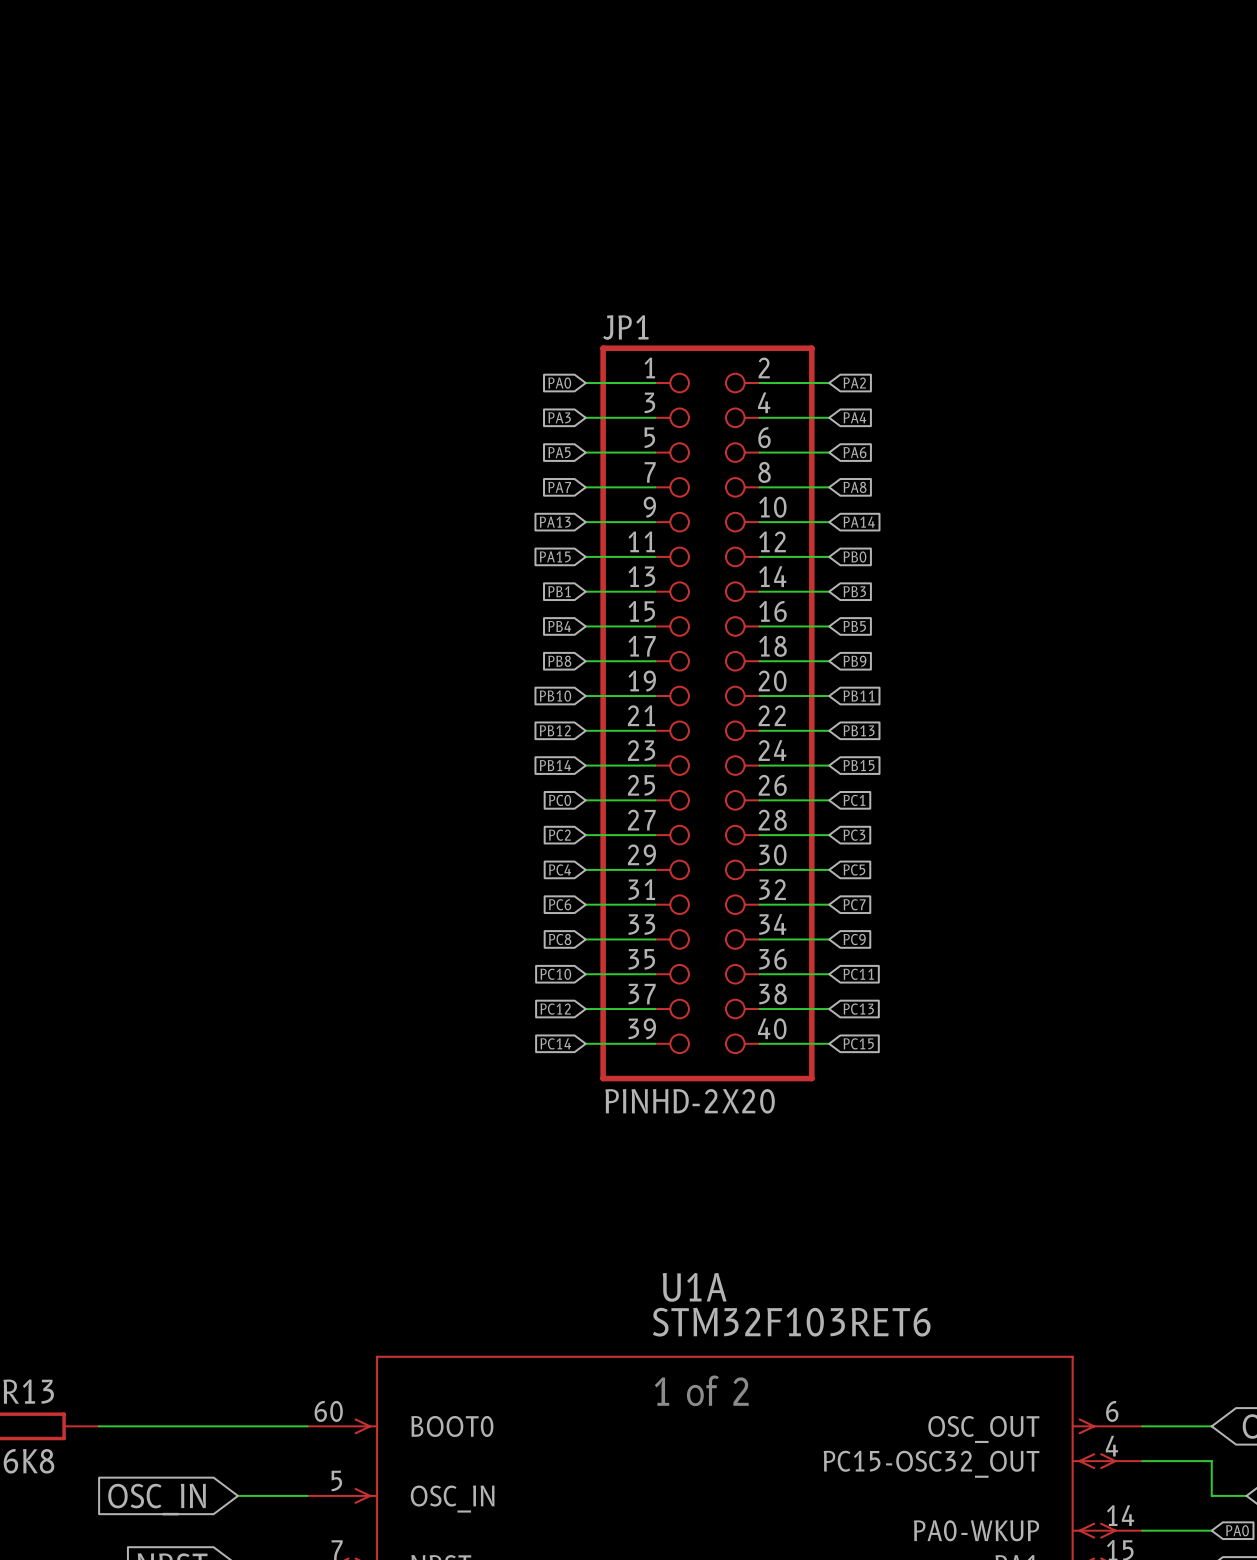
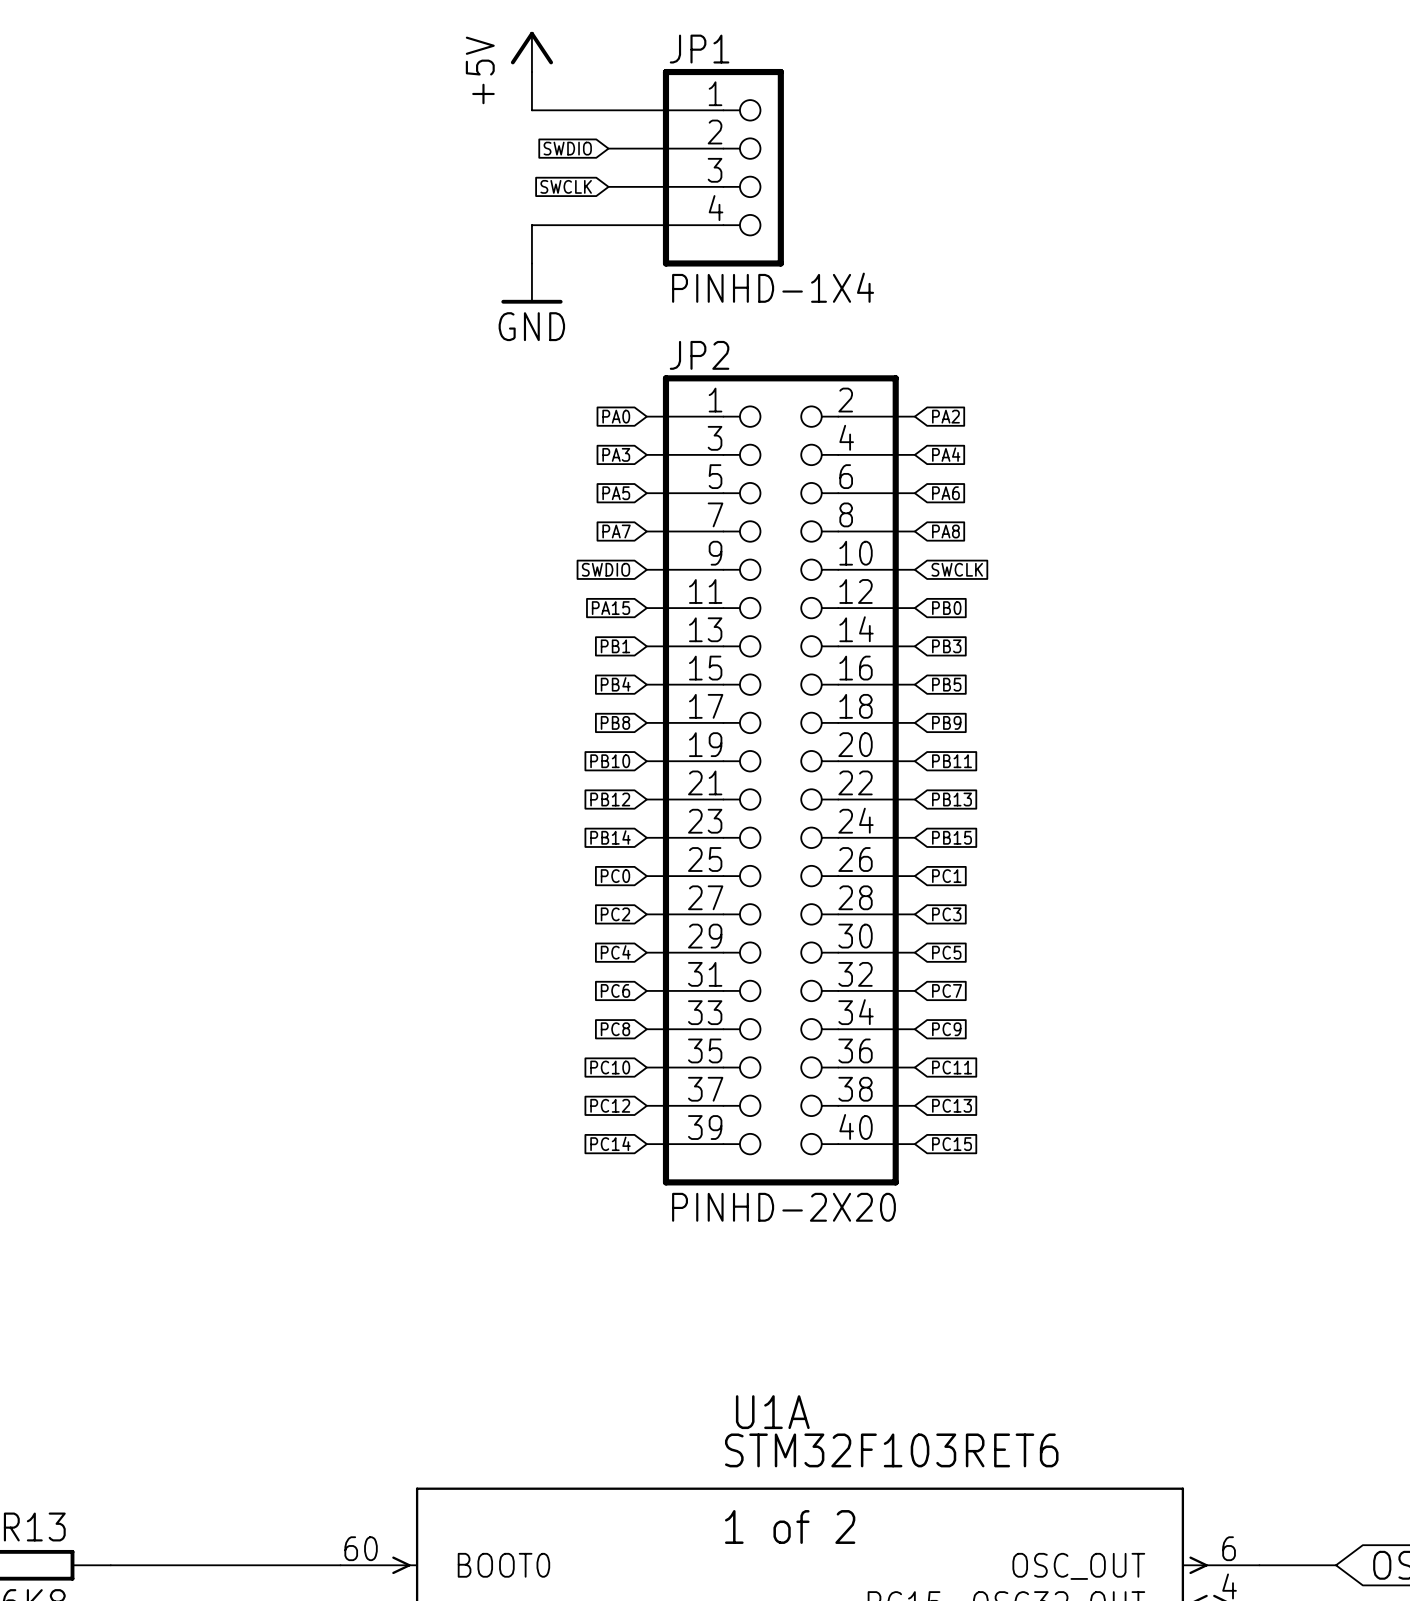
power symbol: none -> +5V (531, 51)
wire: none -> (531, 72) (531, 110) (723, 110)
global label: none -> SWDIO (567, 148)
wire: none -> (608, 148) (723, 148)
JP1: none -> PINHD-1X4 (723, 167)
global label: none -> SWCLK (566, 186)
wire: none -> (608, 186) (723, 186)
wire: none -> (723, 225) (531, 225) (531, 263)
power symbol: none -> GND (531, 283)
JP1 name: JP1 (625, 327) -> JP2 (699, 355)
global label: PA13 (555, 522) -> SWDIO (606, 569)
global label: PA14 (859, 522) -> SWCLK (957, 569)

